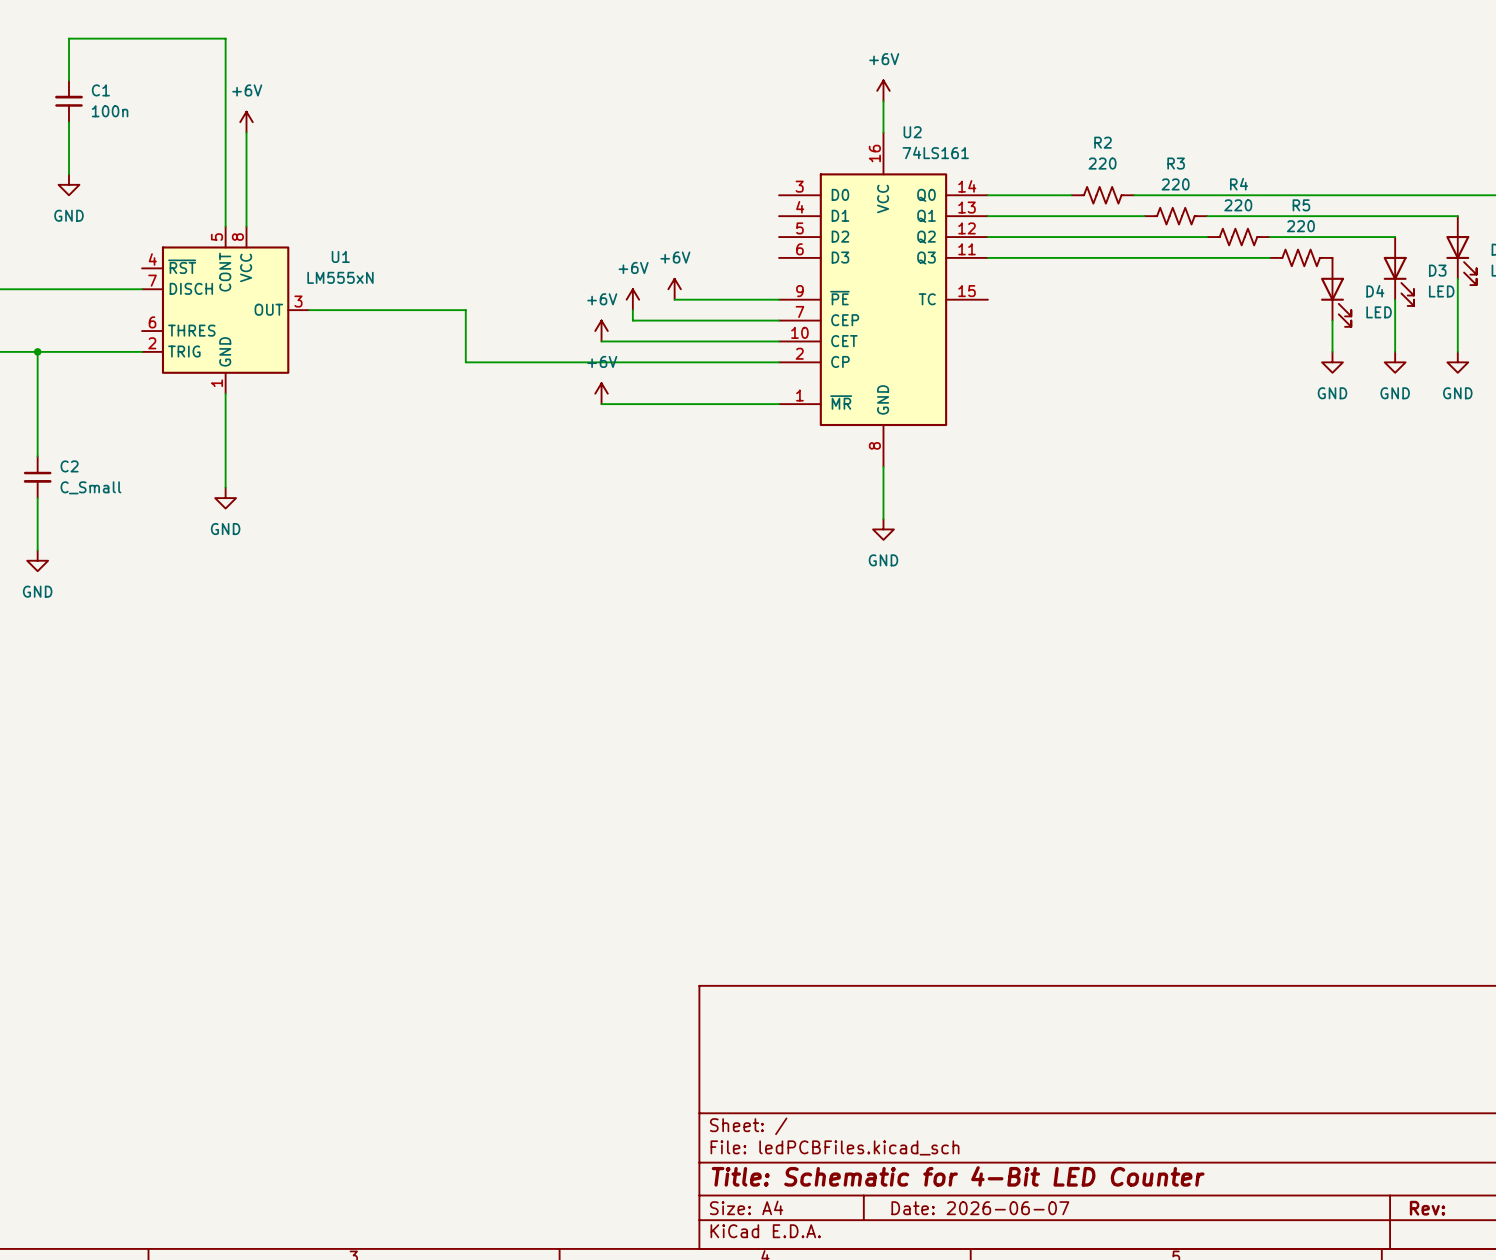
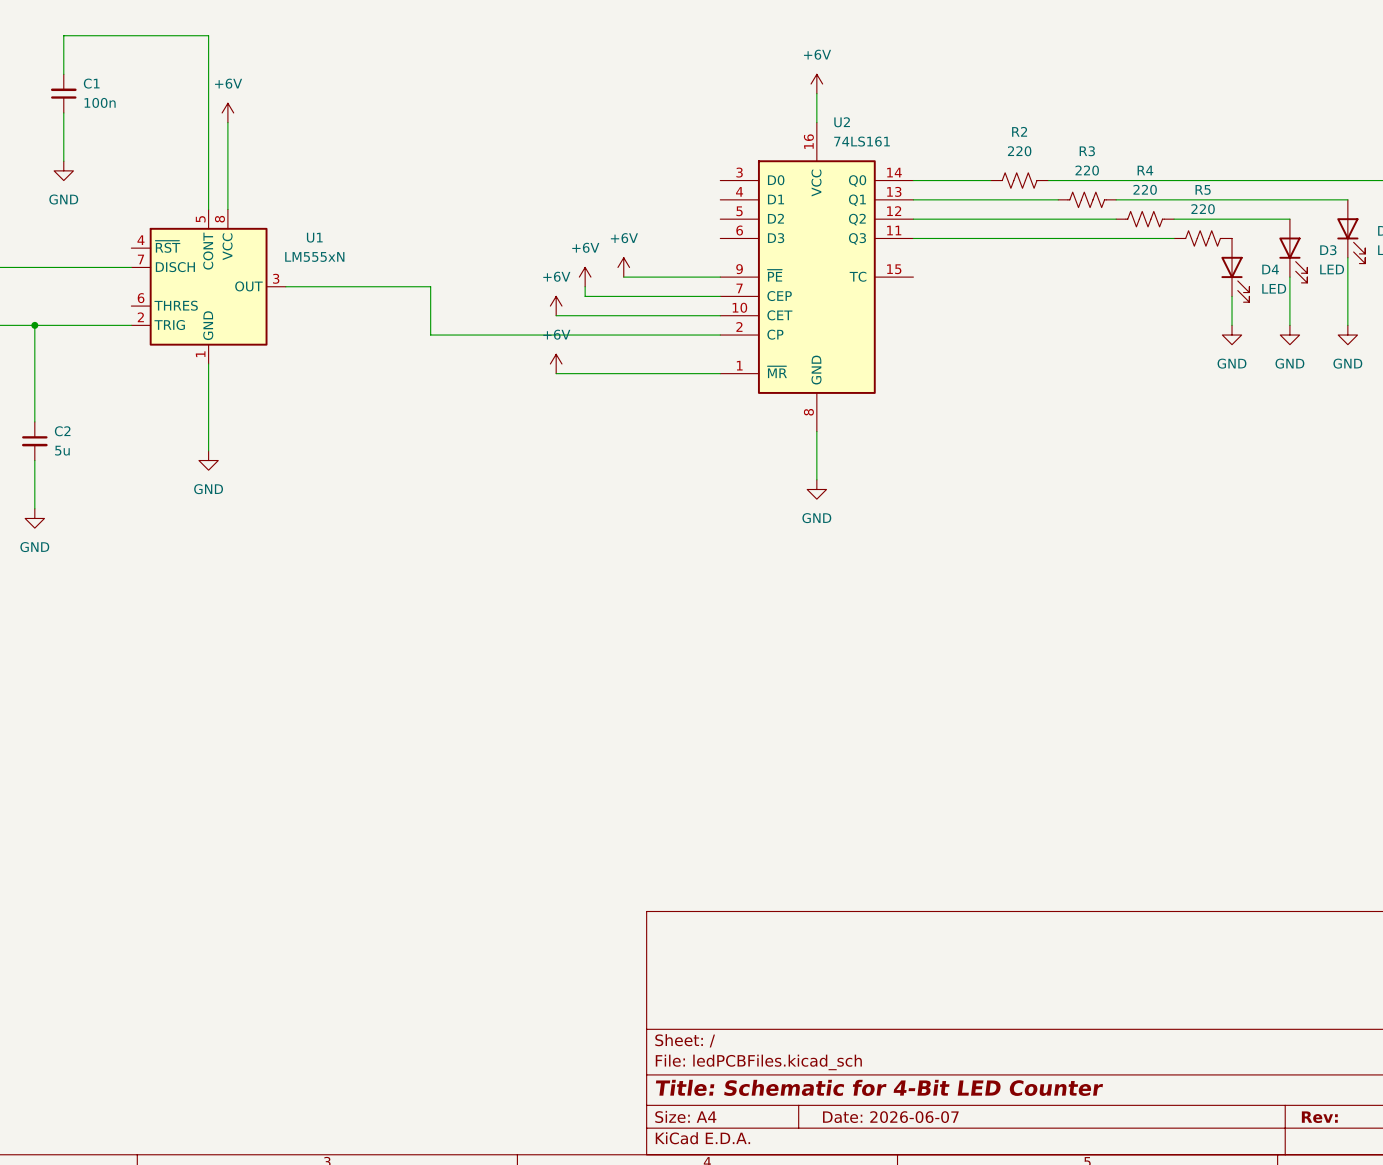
C2 value: C_Small (90, 487) -> 5u (62, 450)

